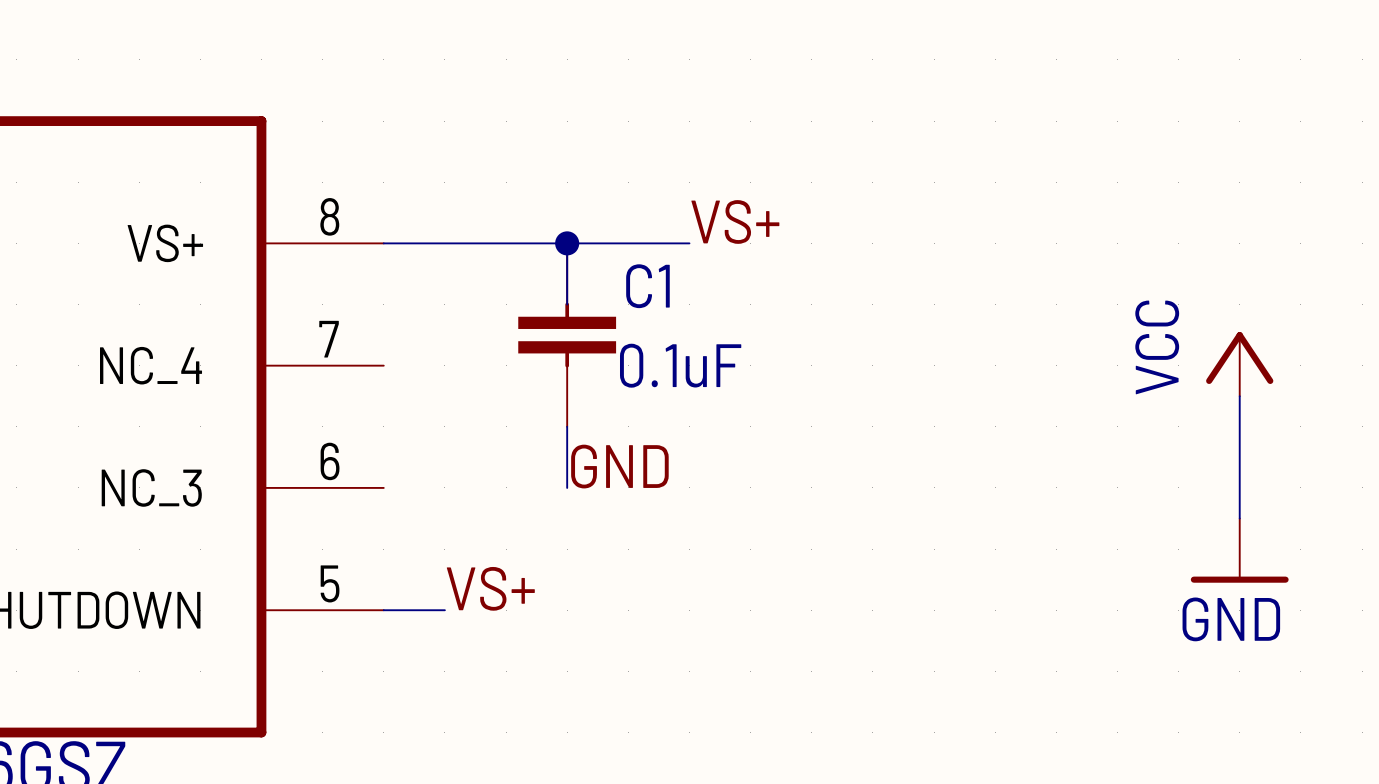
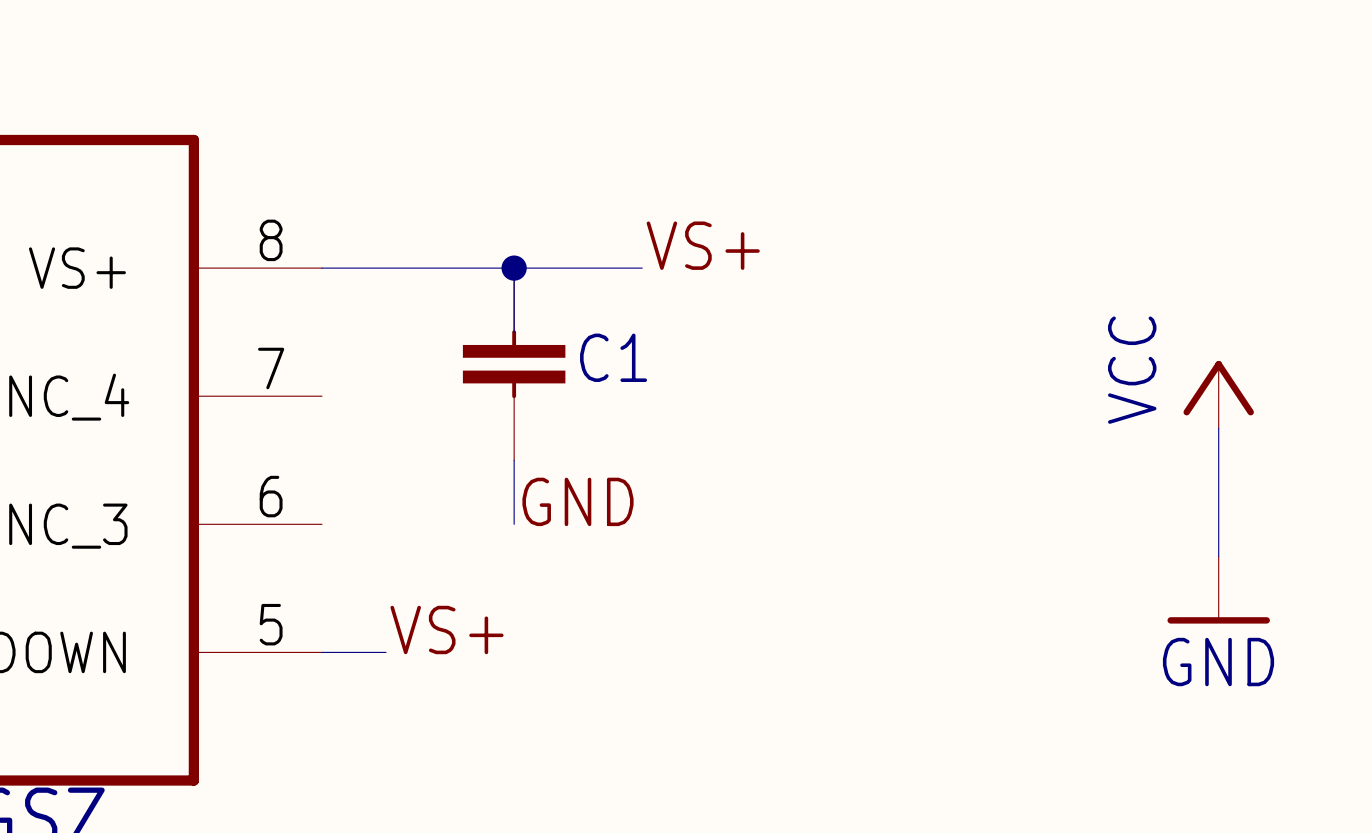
C1 name position: C1 (647, 286) -> C1 (613, 357)
C1 value: 0.1uF (680, 365) -> none

